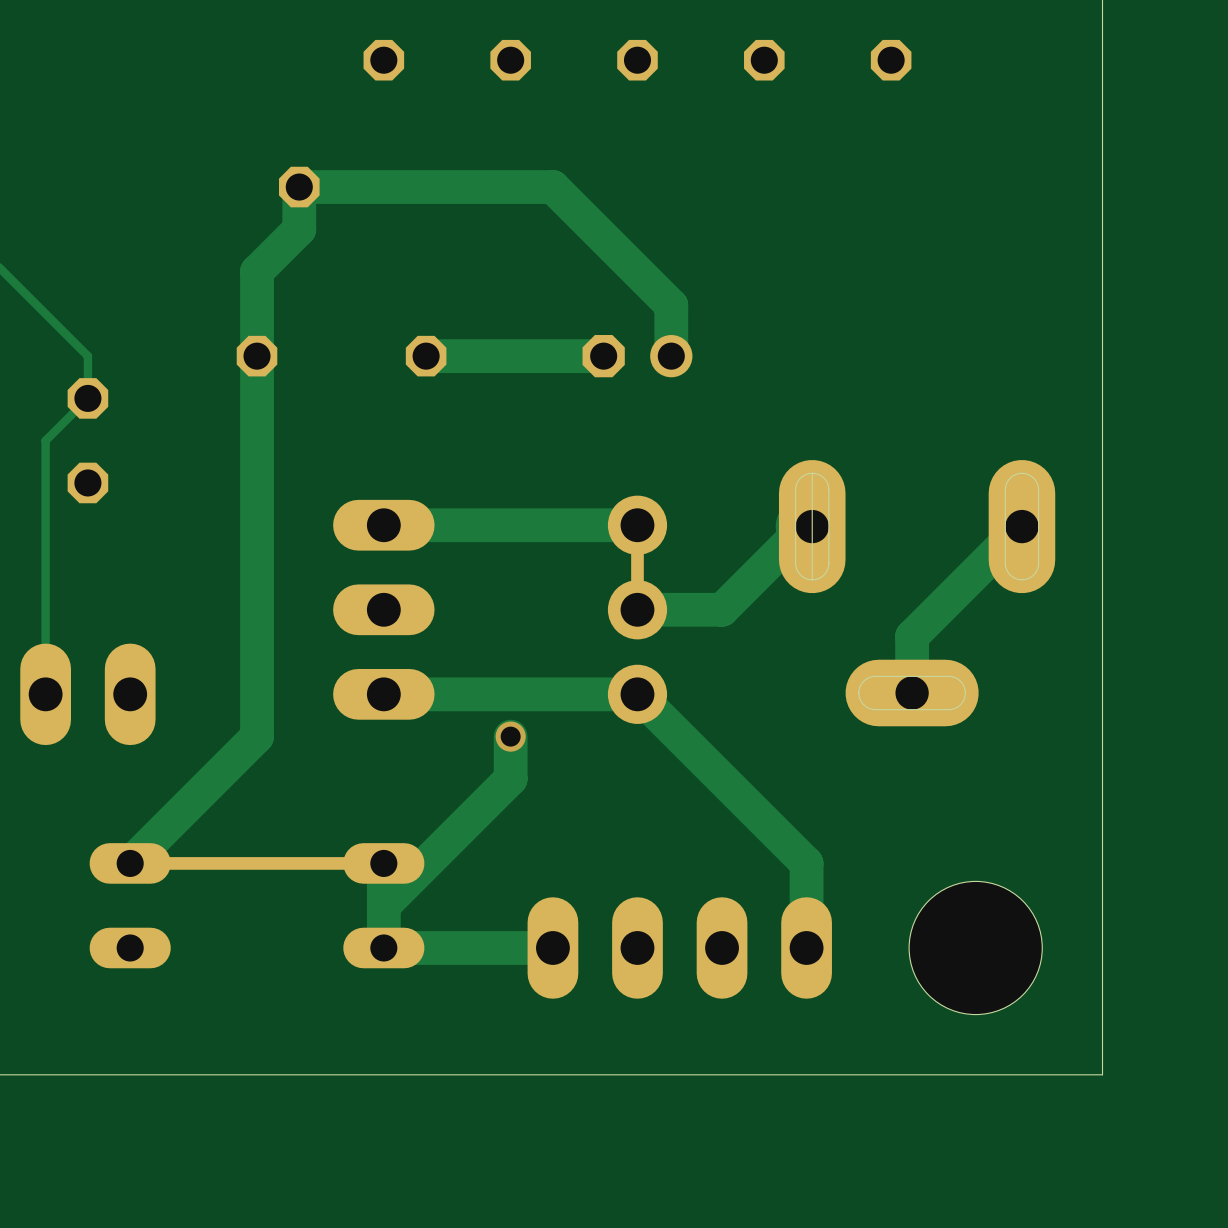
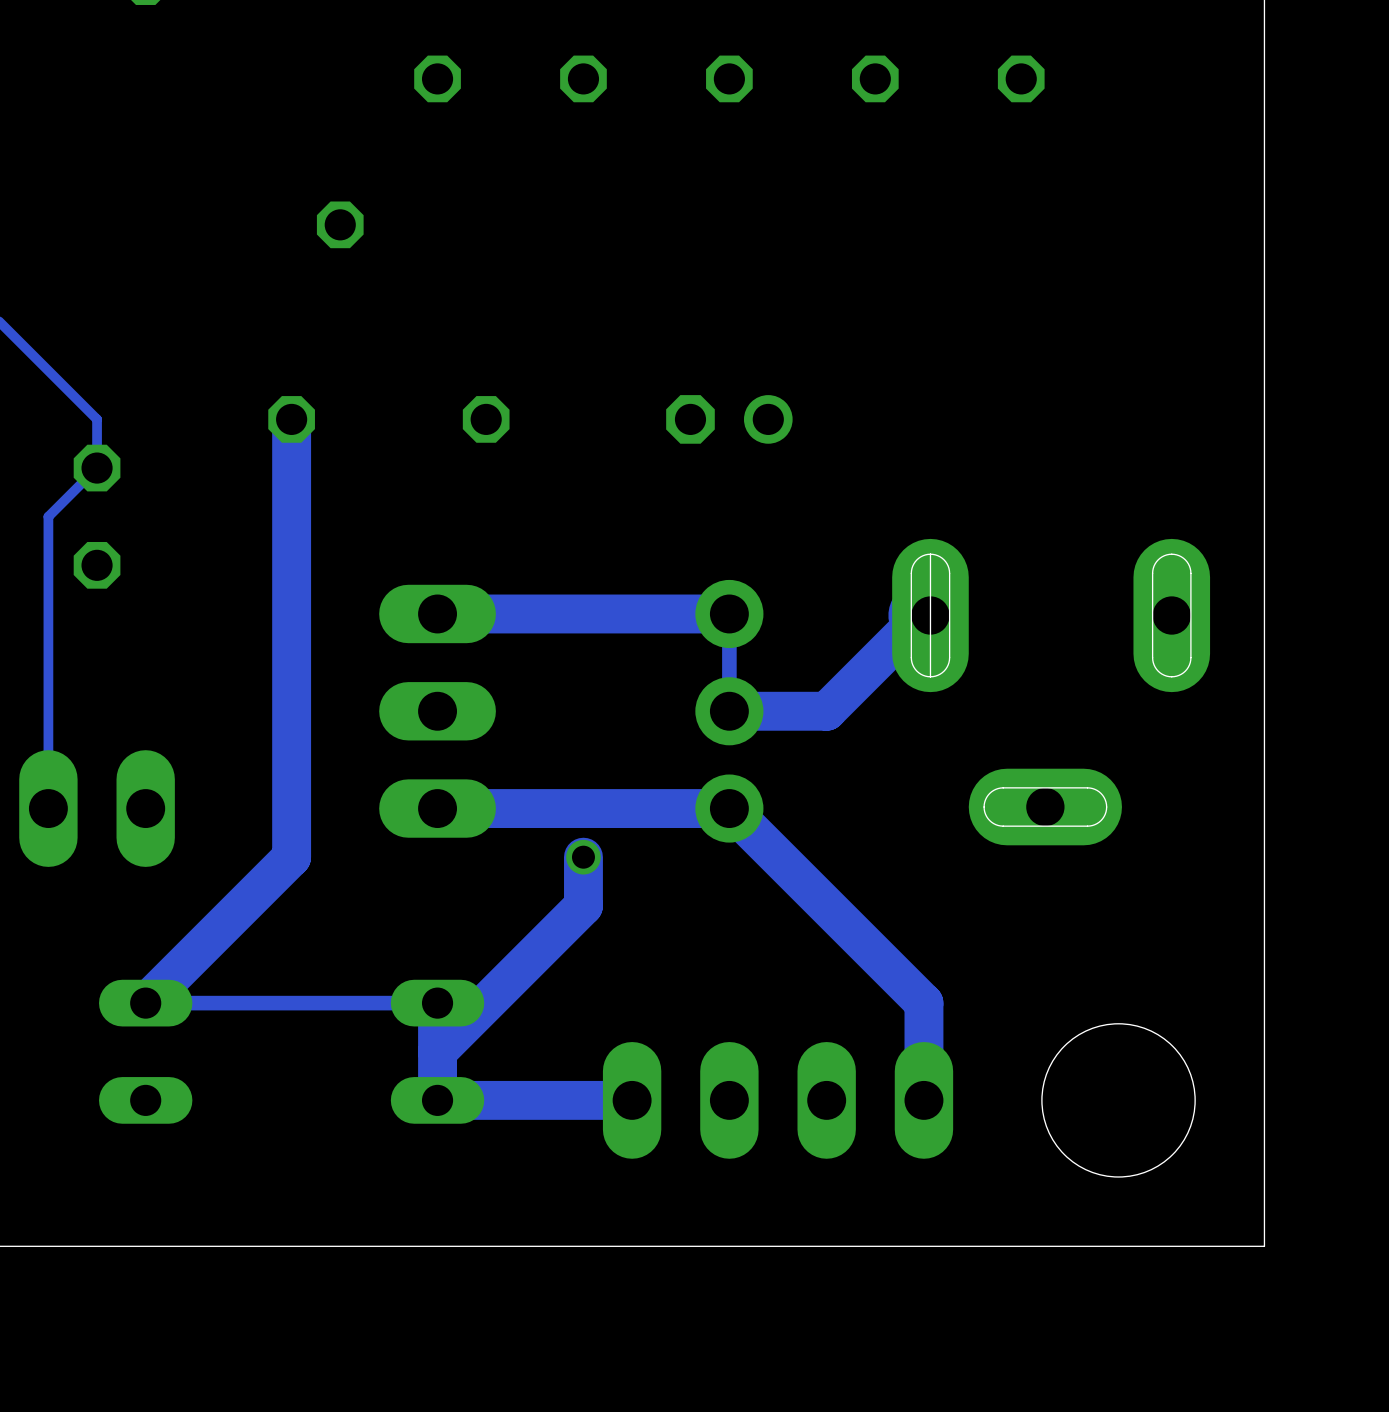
track: (603, 356) (426, 356) -> none
track: (671, 356) (671, 305) (552, 187) (299, 187) (299, 229) (257, 271) (257, 356) -> none
track: (1021, 526) (912, 636) (912, 693) -> none

